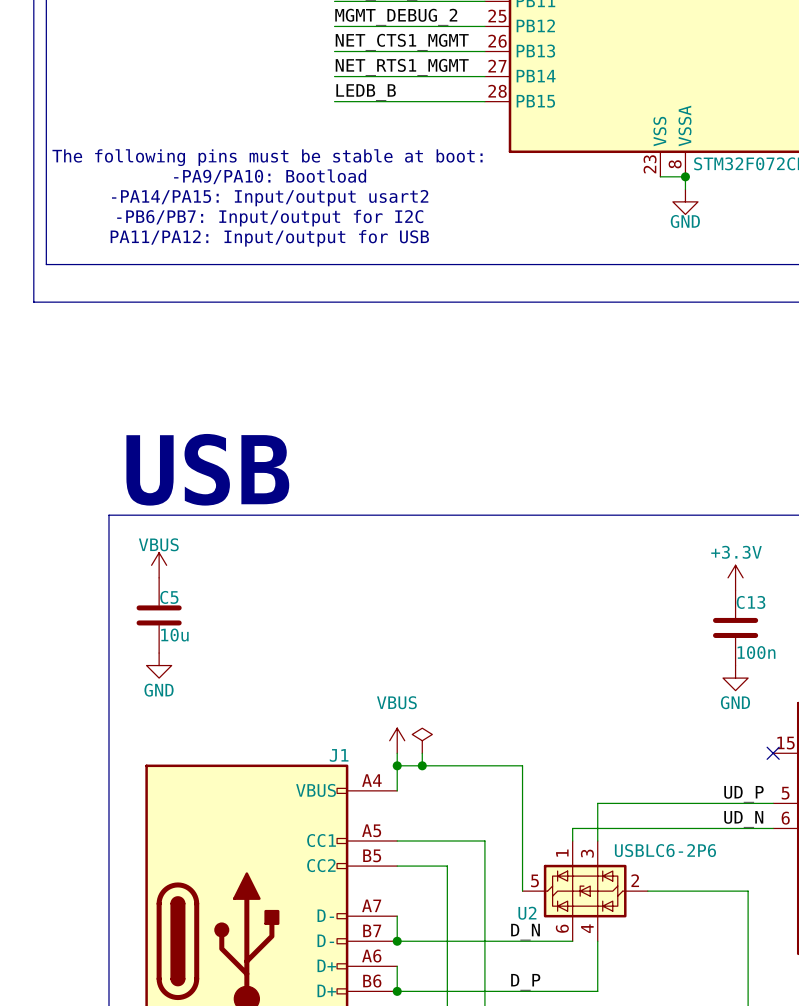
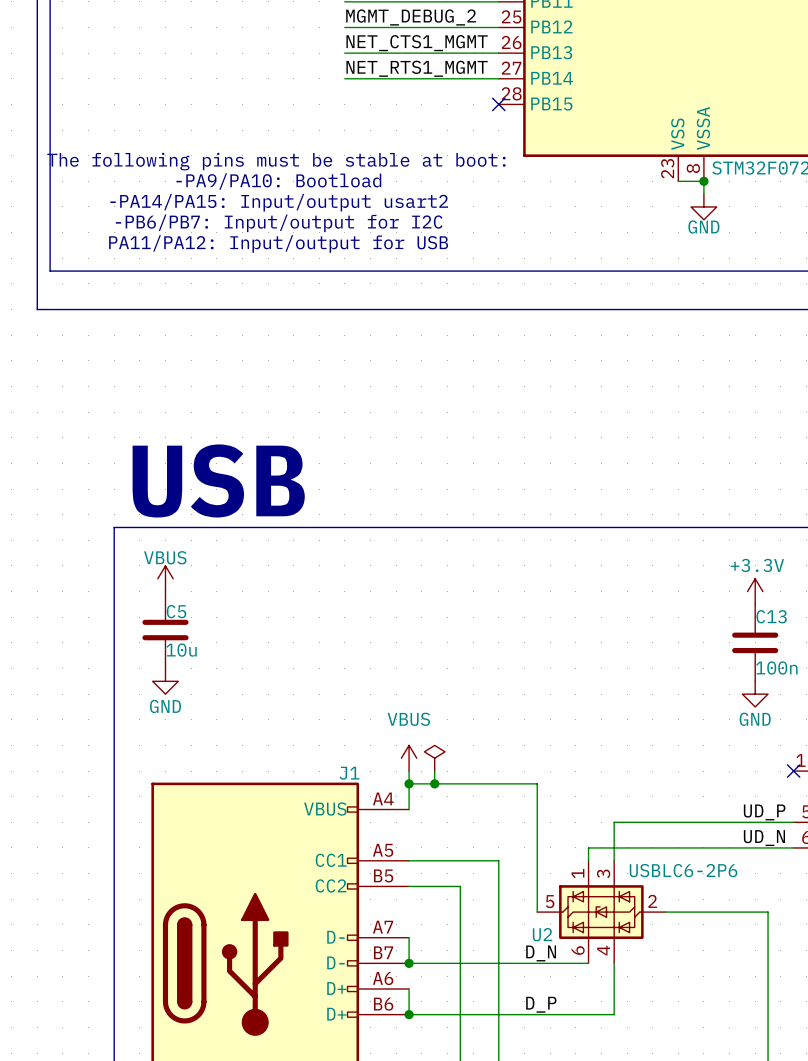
label: LEDB_B (366, 92) -> none
wire: (334, 101) (484, 101) -> none
no-connect mark: none -> (498, 104)

